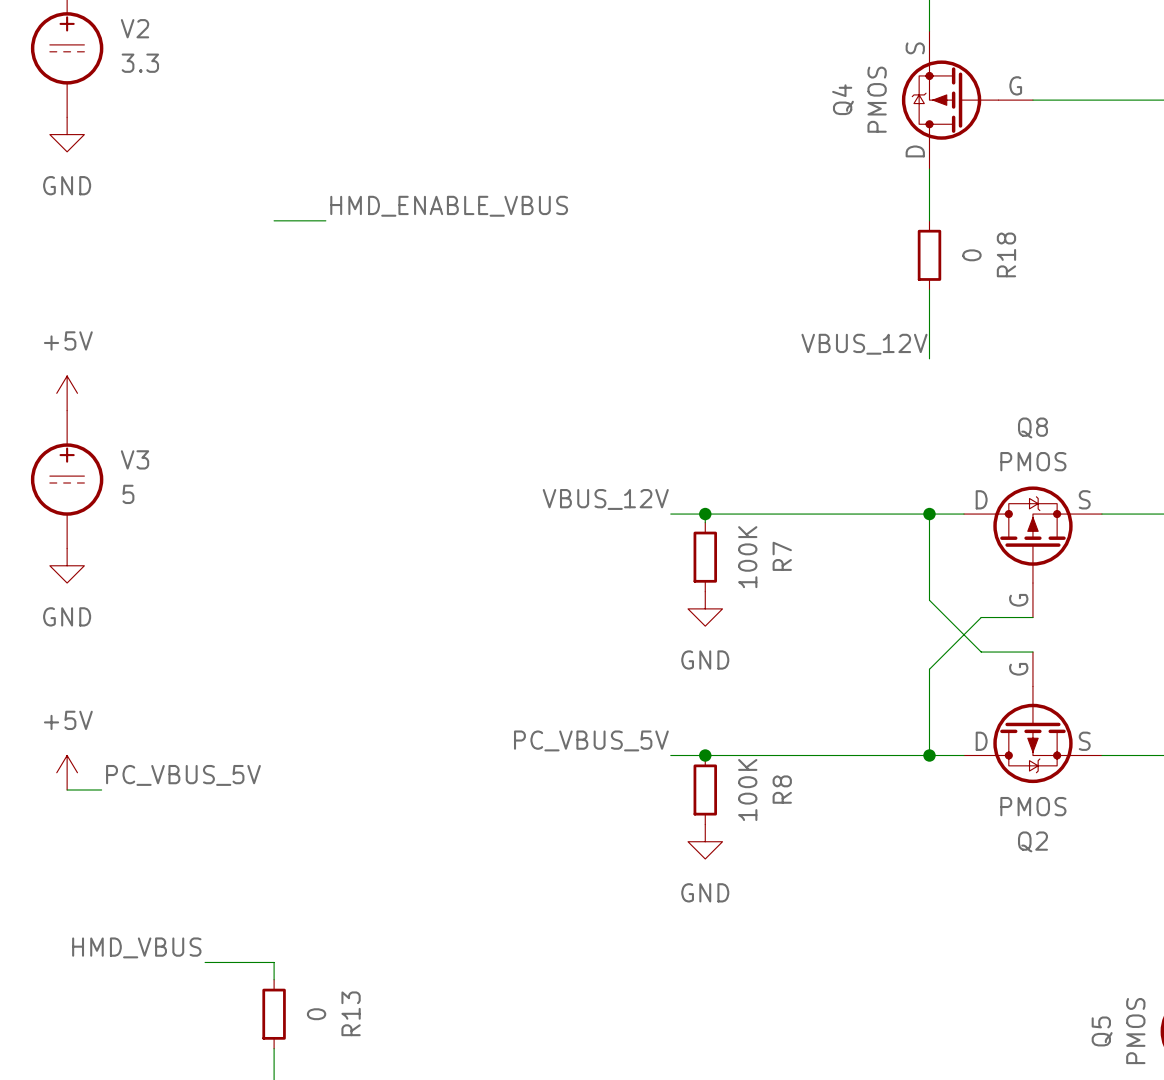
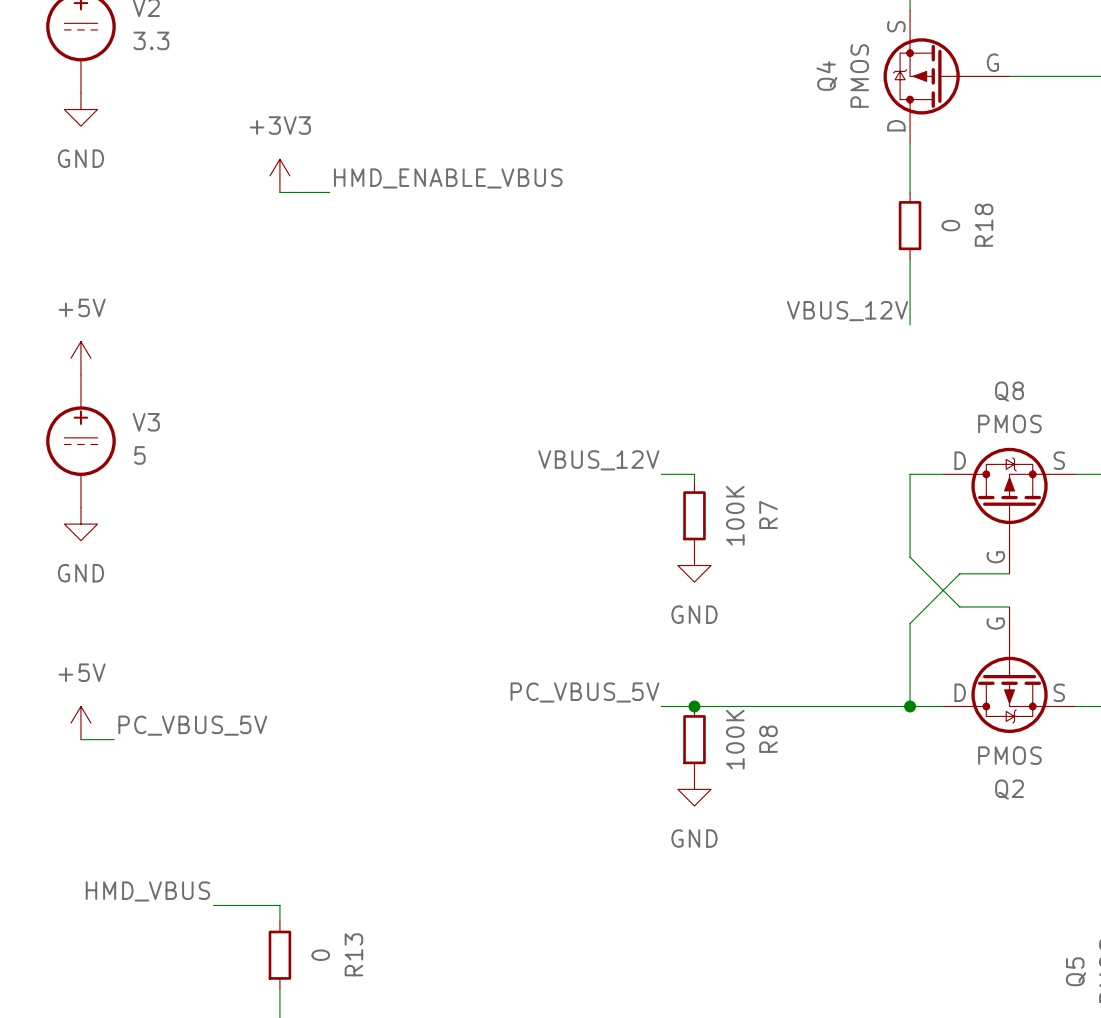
power symbol: none -> +3V3 (279, 175)
wire: (705, 514) (929, 514) -> none
junction: (705, 514) -> none
junction: (929, 514) -> none

